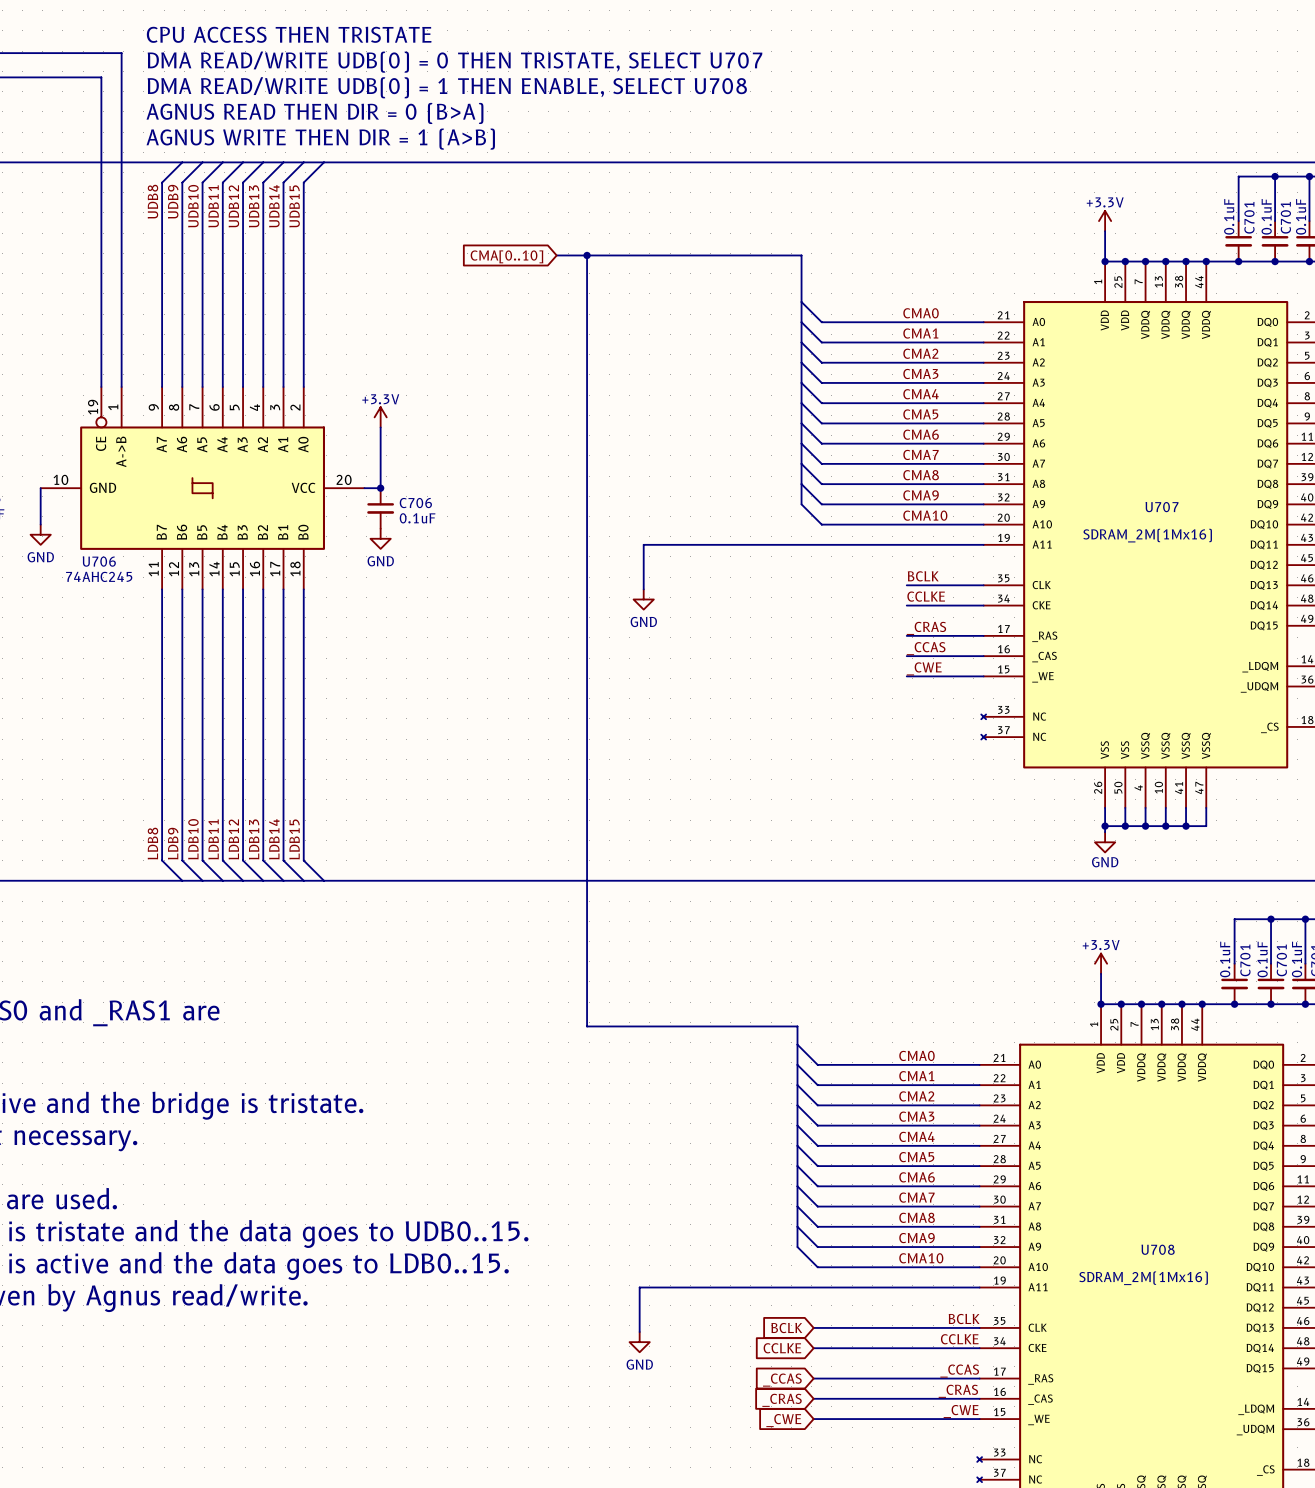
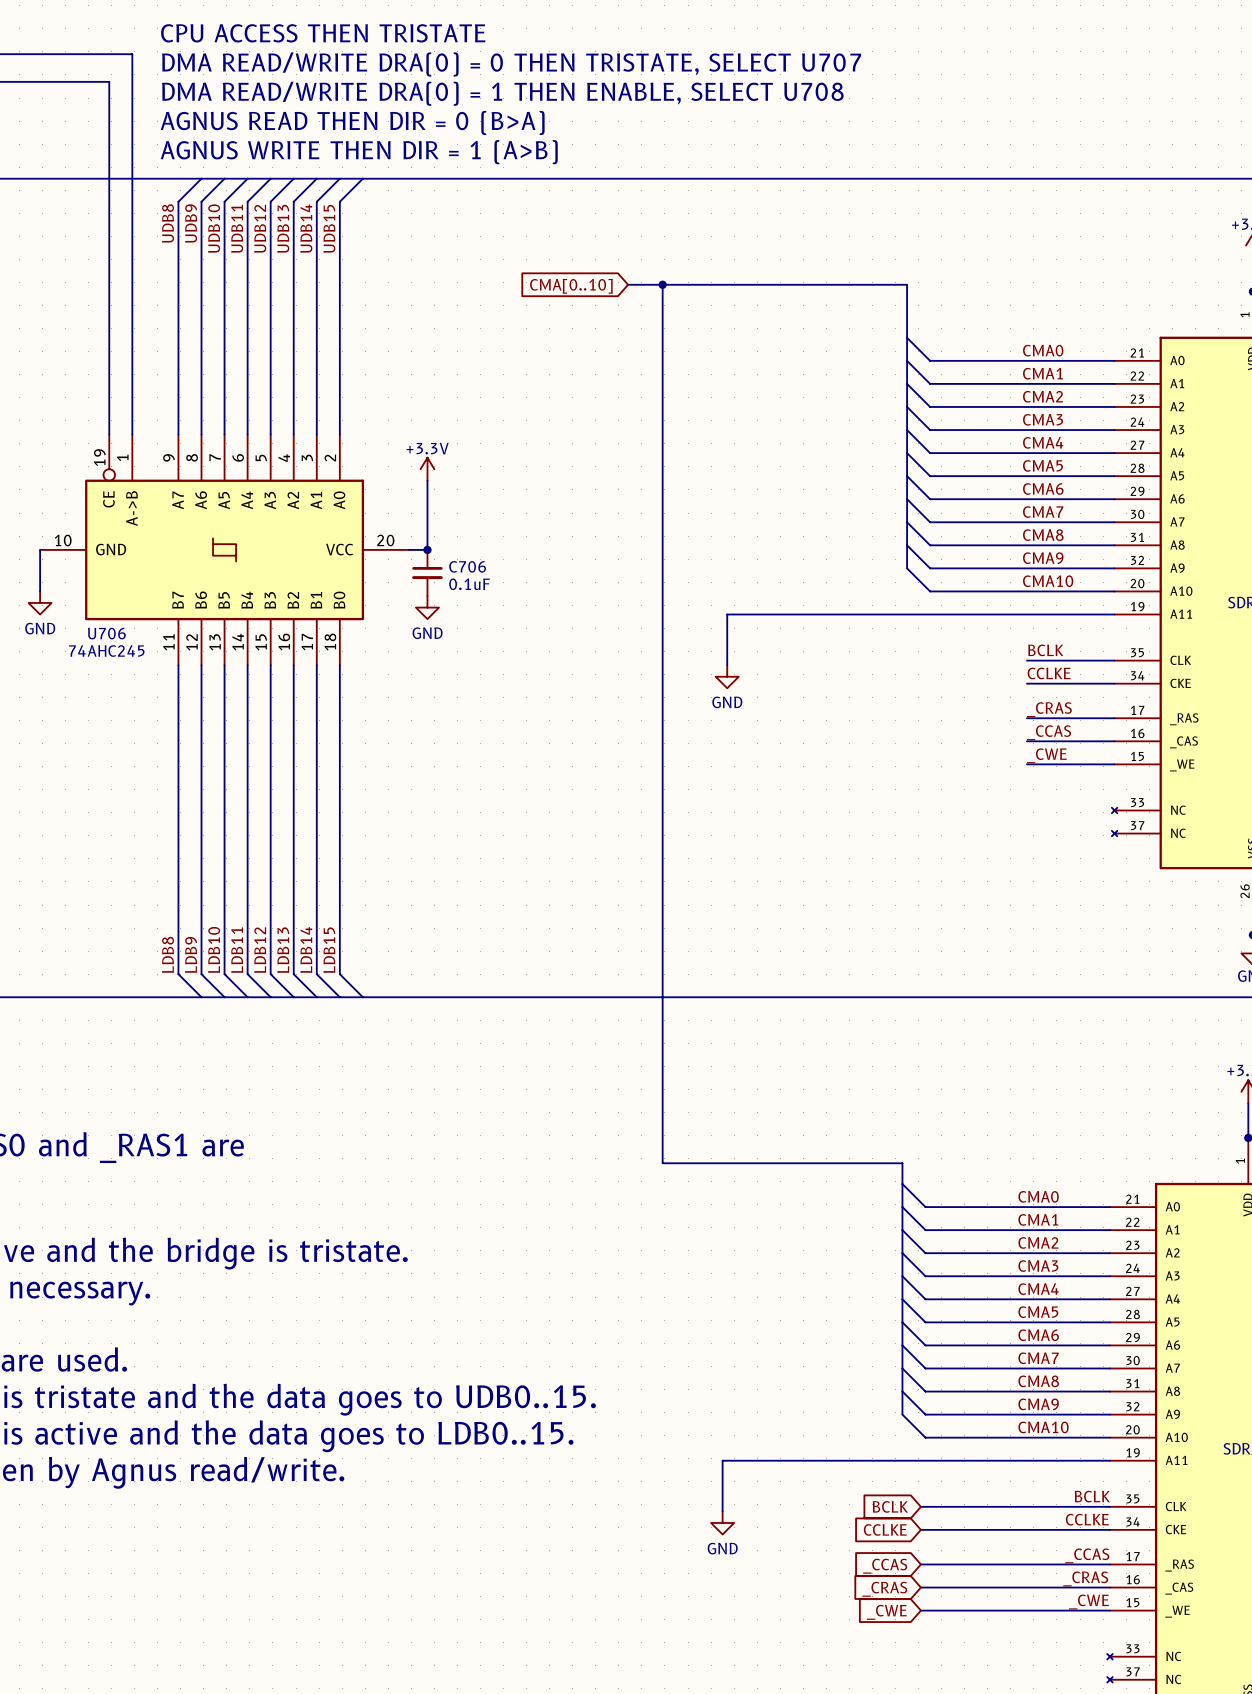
text: DMA READ/WRITE UDB(0) = 0 THEN TRISTATE, SELECT U707 (454, 62) -> DMA READ/WRITE DRA(0) = 0 THEN TRISTATE, SELECT U707 (511, 64)
text: DMA READ/WRITE UDB(0) = 1 THEN ENABLE, SELECT U708 (447, 87) -> DMA READ/WRITE DRA(0) = 1 THEN ENABLE, SELECT U708 (502, 93)

